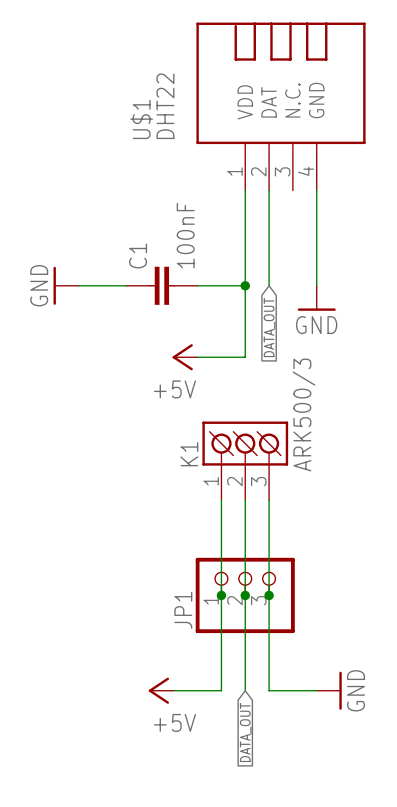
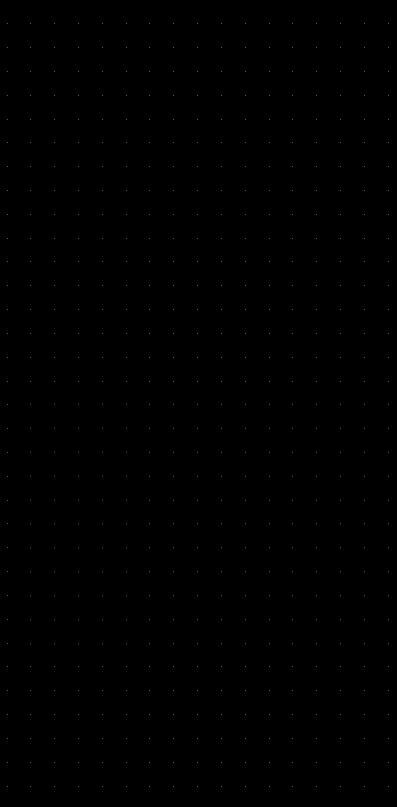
U$1: DHT22 (280, 106) -> none
wire: (245, 190) (245, 357) (197, 357) -> none
wire: (269, 190) (269, 285) -> none
wire: (316, 190) (316, 285) -> none
power symbol: GND (66, 285) -> none
wire: (78, 285) (126, 285) -> none
C1: 100nF (161, 285) -> none
wire: (197, 285) (245, 285) -> none
junction: (245, 285) -> none
power symbol: GND (316, 298) -> none
global label: DATA_OUT (269, 327) -> none
power symbol: +5V (185, 357) -> none
K1: ARK500/3 (245, 460) -> none
wire: (221, 500) (221, 690) (173, 690) -> none
wire: (245, 500) (245, 690) -> none
wire: (269, 500) (269, 690) (316, 690) -> none
junction: (221, 595) -> none
JP1: (245, 595) -> none
junction: (245, 595) -> none
junction: (269, 595) -> none
power symbol: +5V (161, 690) -> none
power symbol: GND (329, 690) -> none
global label: DATA_OUT (245, 732) -> none

